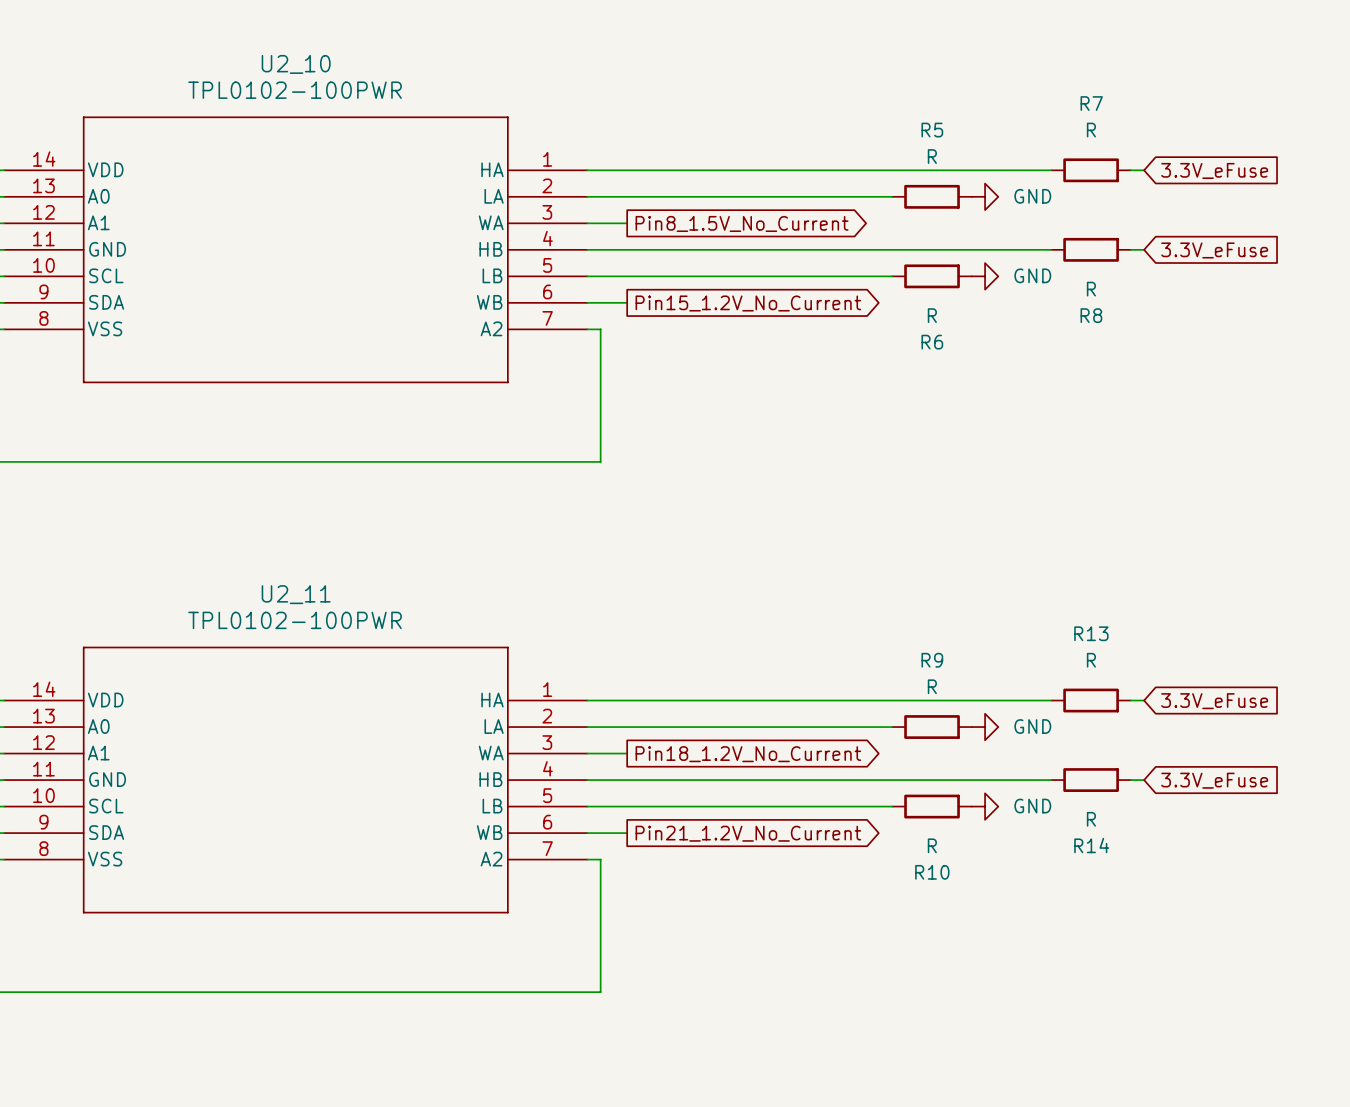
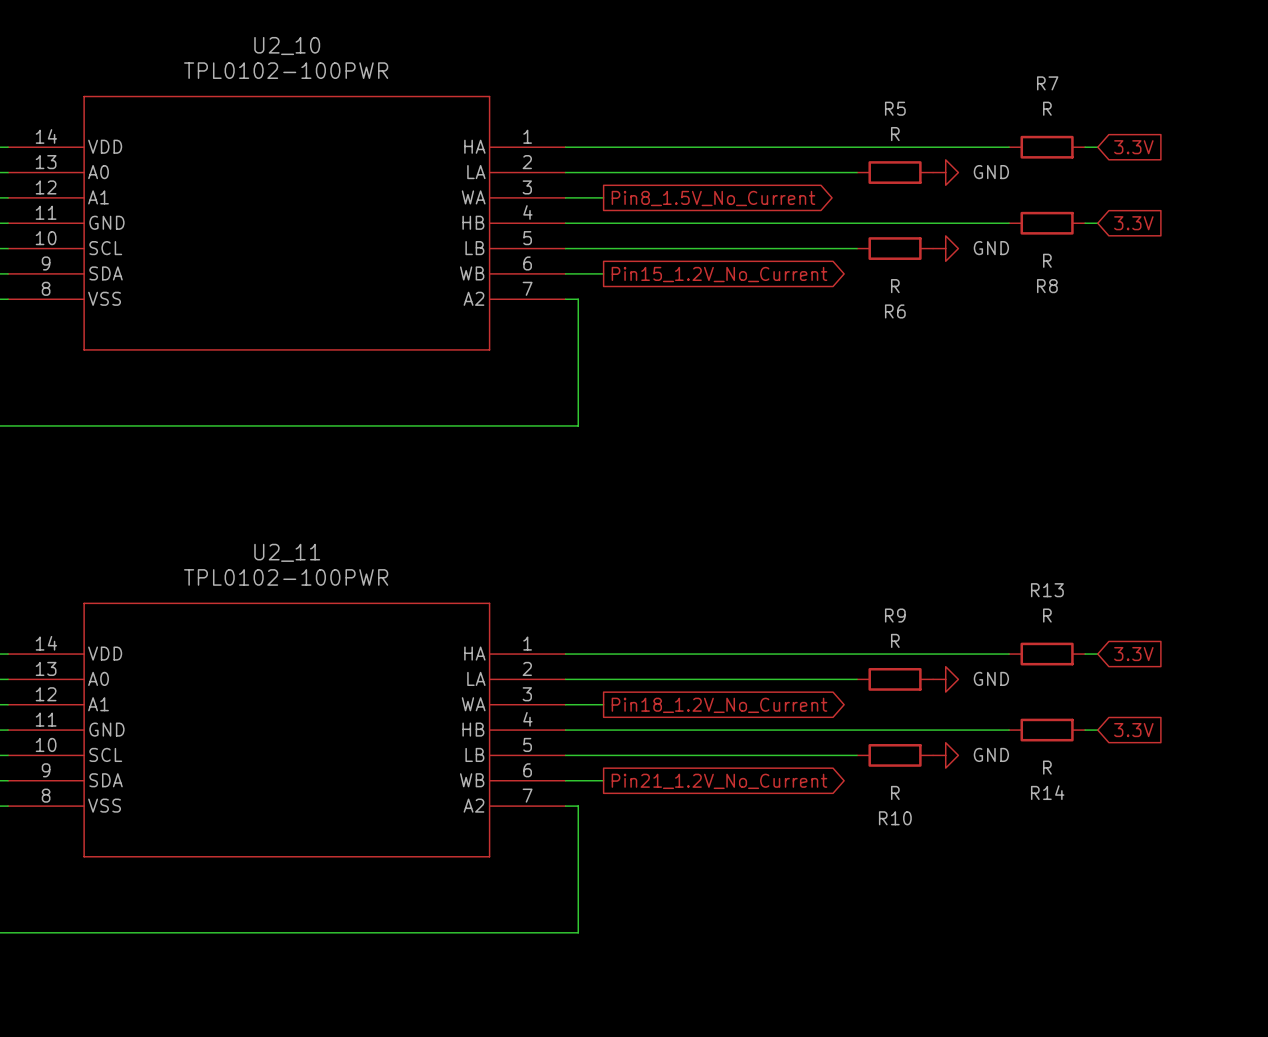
global label: 3.3V_eFuse (1214, 170) -> 3.3V (1133, 147)
global label: 3.3V_eFuse (1214, 250) -> 3.3V (1133, 223)
global label: 3.3V_eFuse (1214, 701) -> 3.3V (1133, 654)
global label: 3.3V_eFuse (1214, 780) -> 3.3V (1133, 730)

